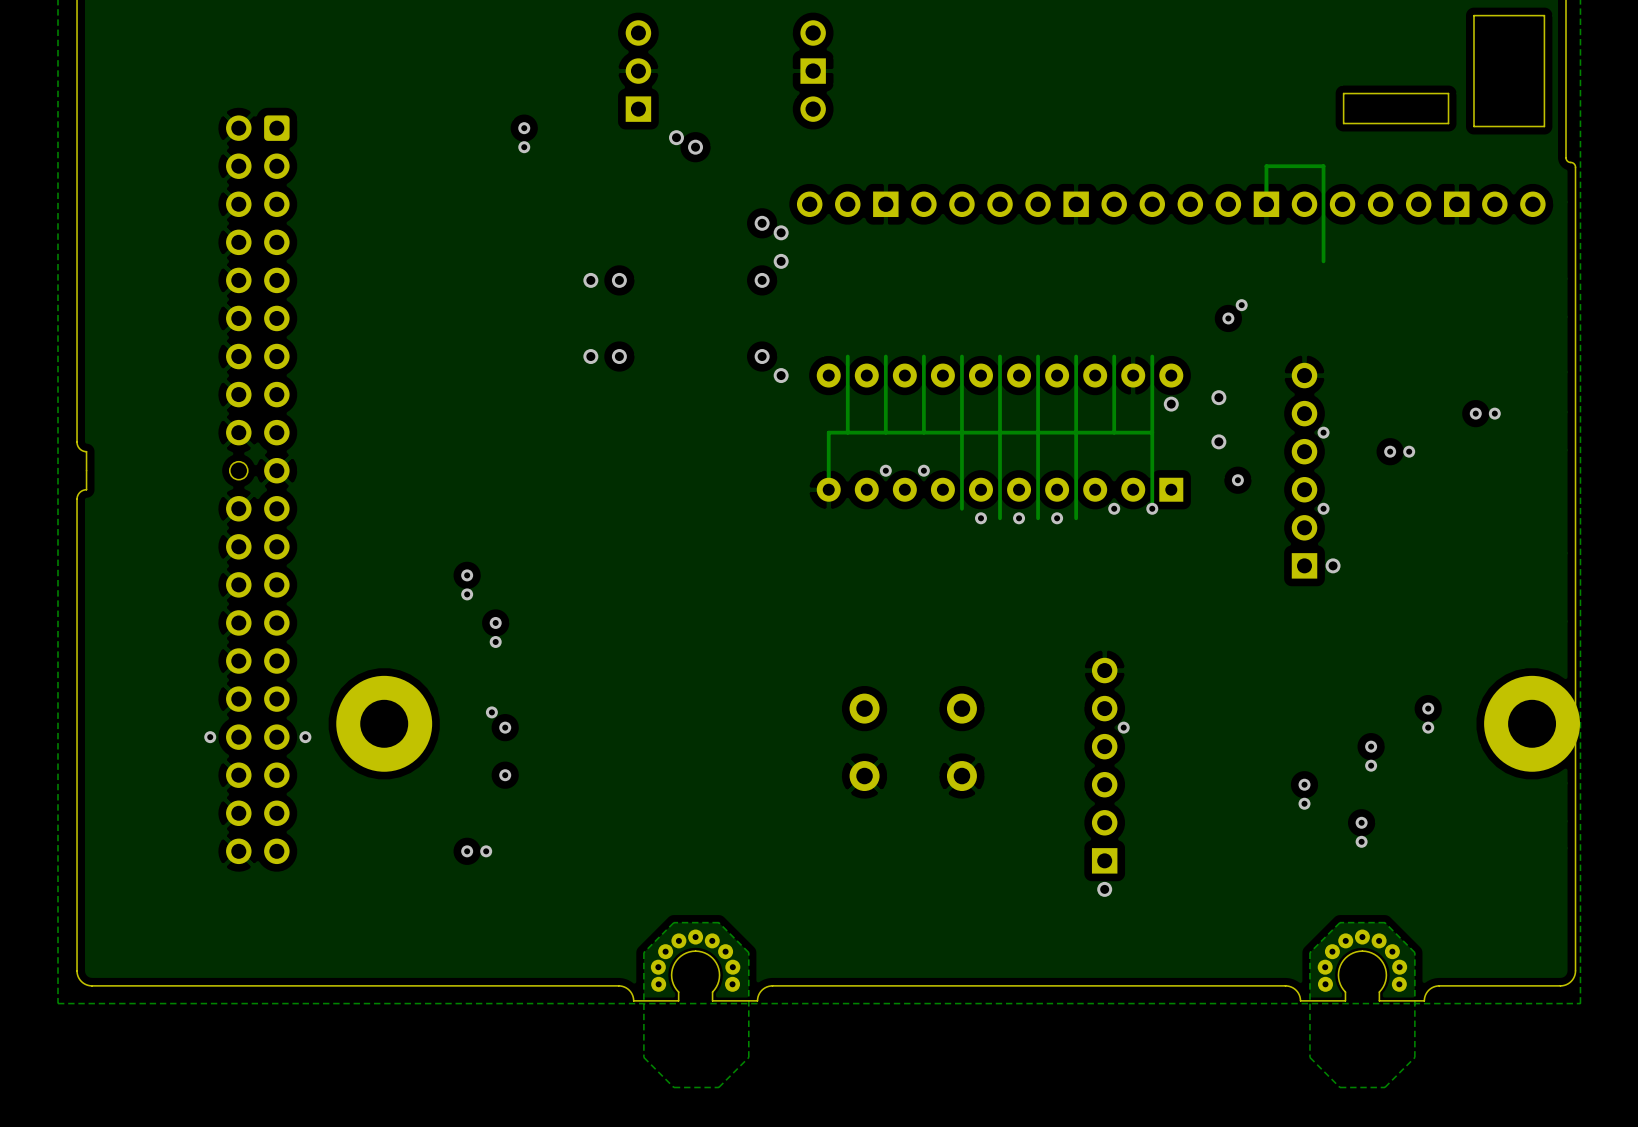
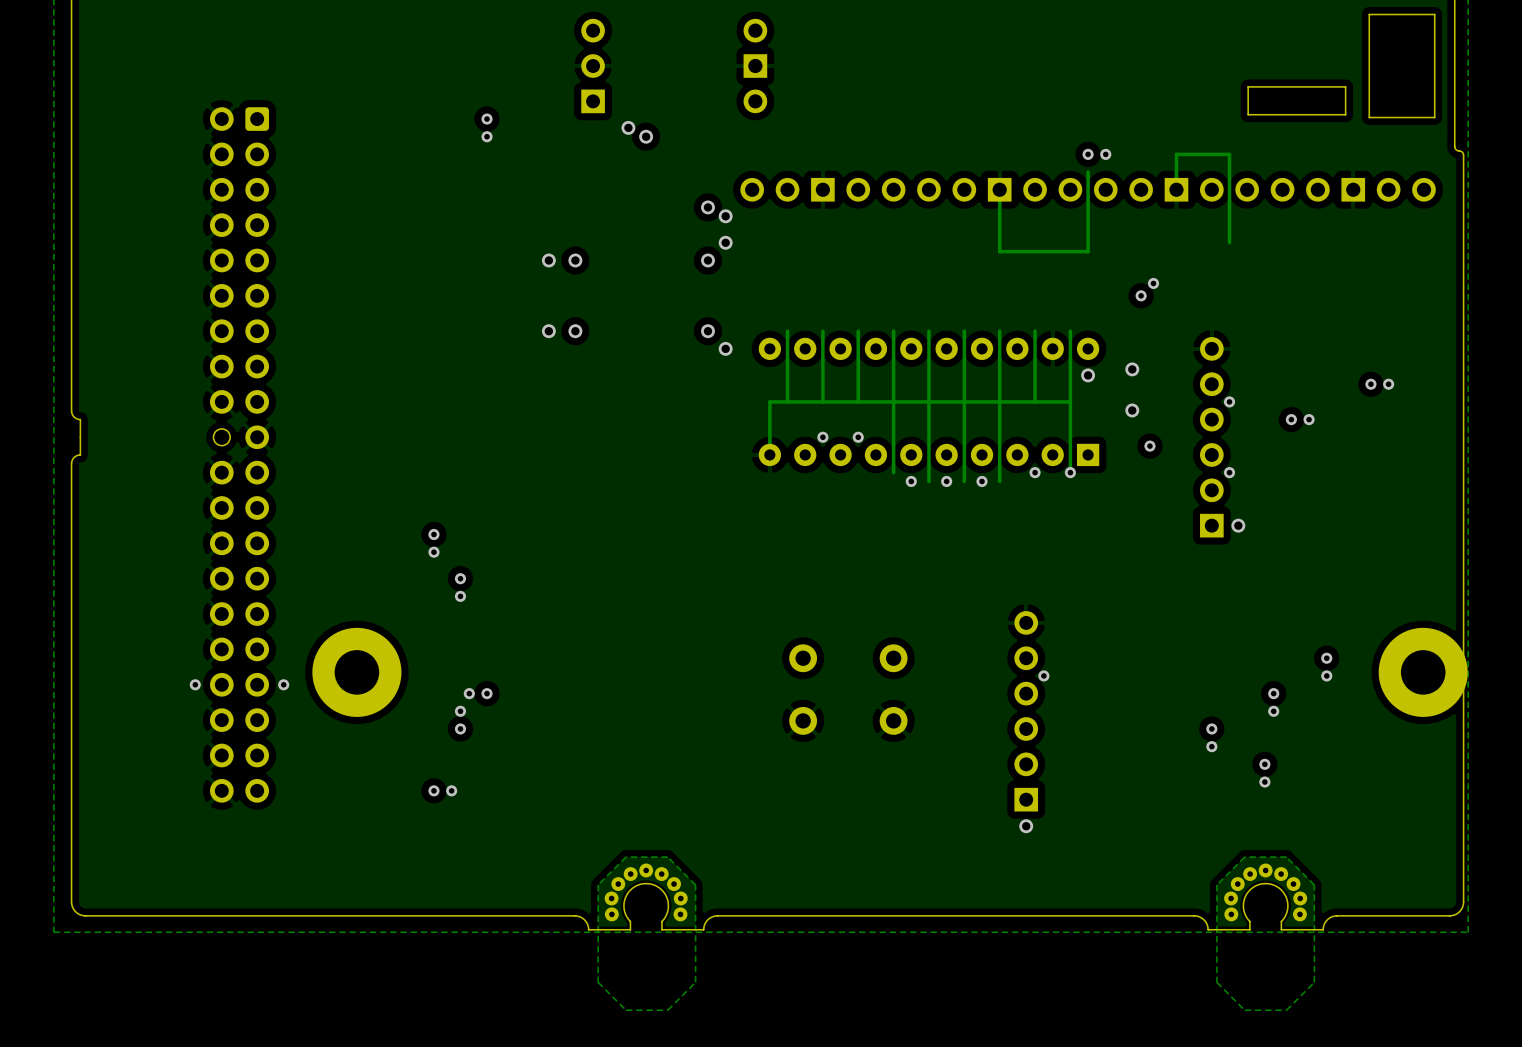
via: none -> (1088, 154)
via: none -> (1105, 154)
track: none -> (1088, 172) (1088, 251) (999, 251) (999, 189)
via: (491, 712) -> none
via: (505, 727) -> none
via: none -> (469, 693)
via: none -> (487, 693)
via: none -> (460, 711)
via: (505, 775) -> none
via: none -> (460, 728)

